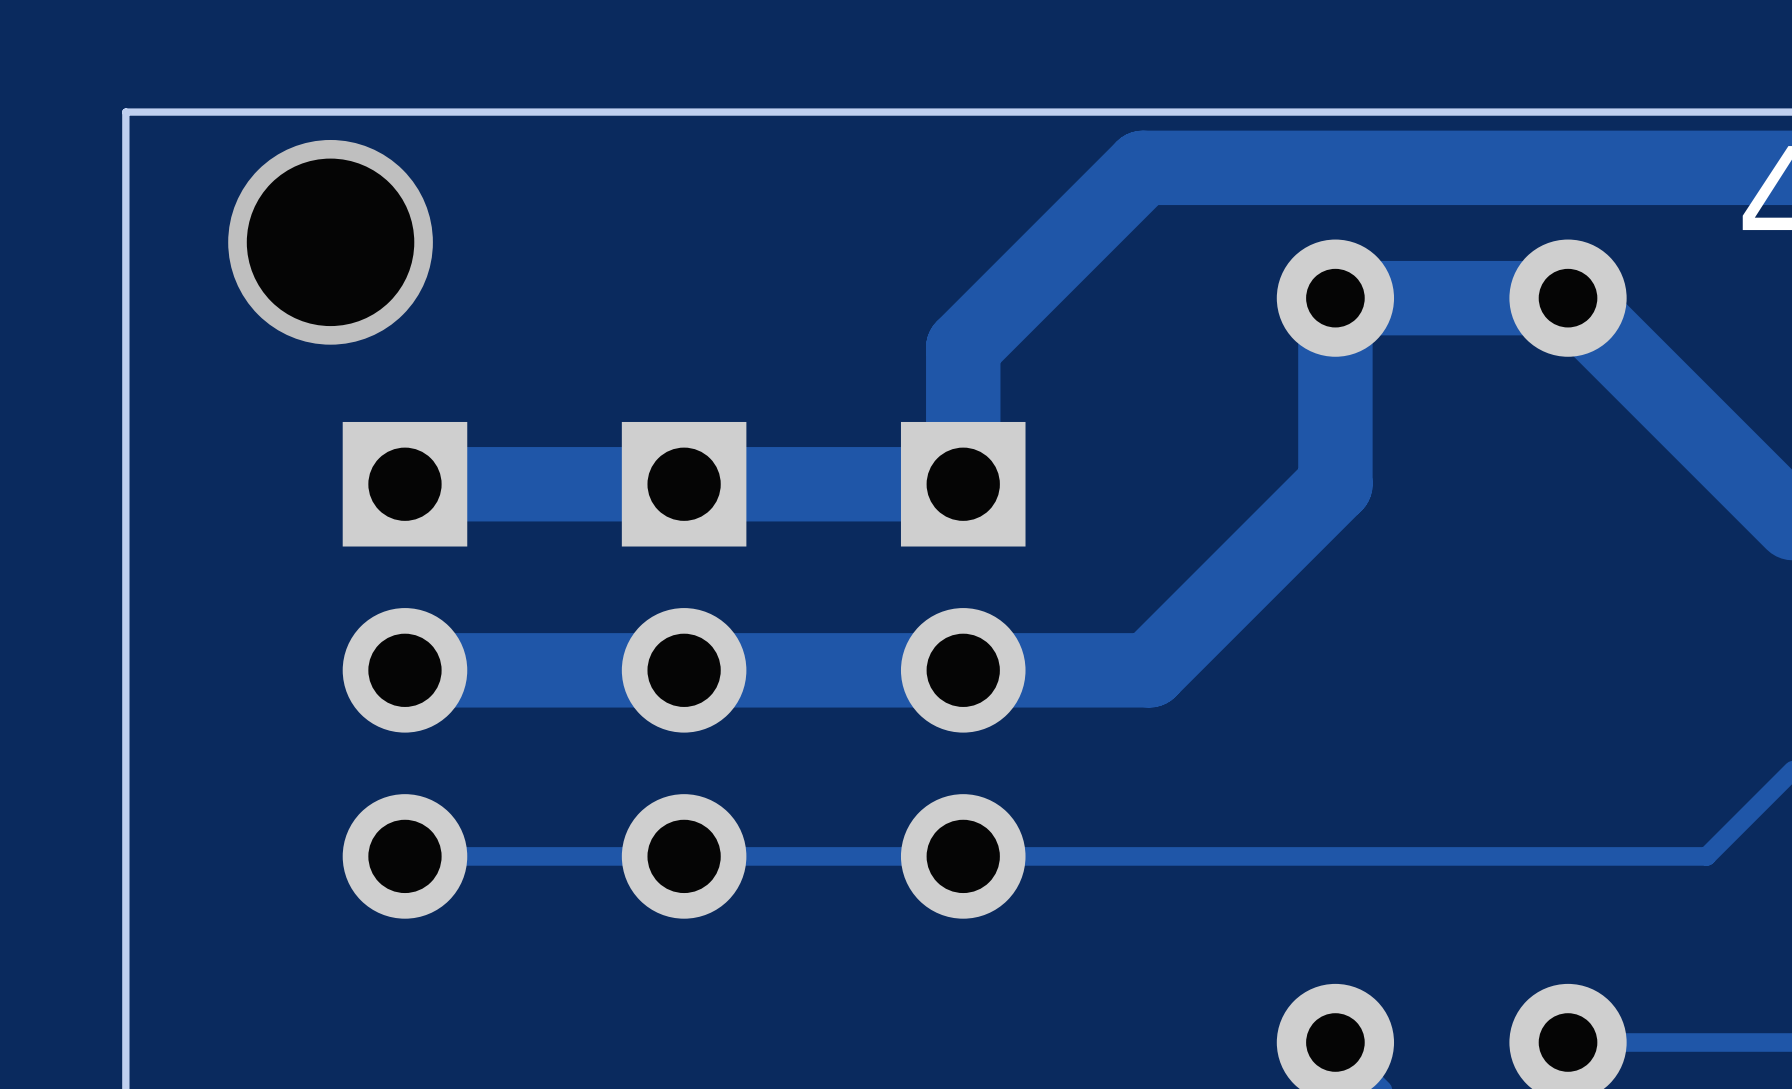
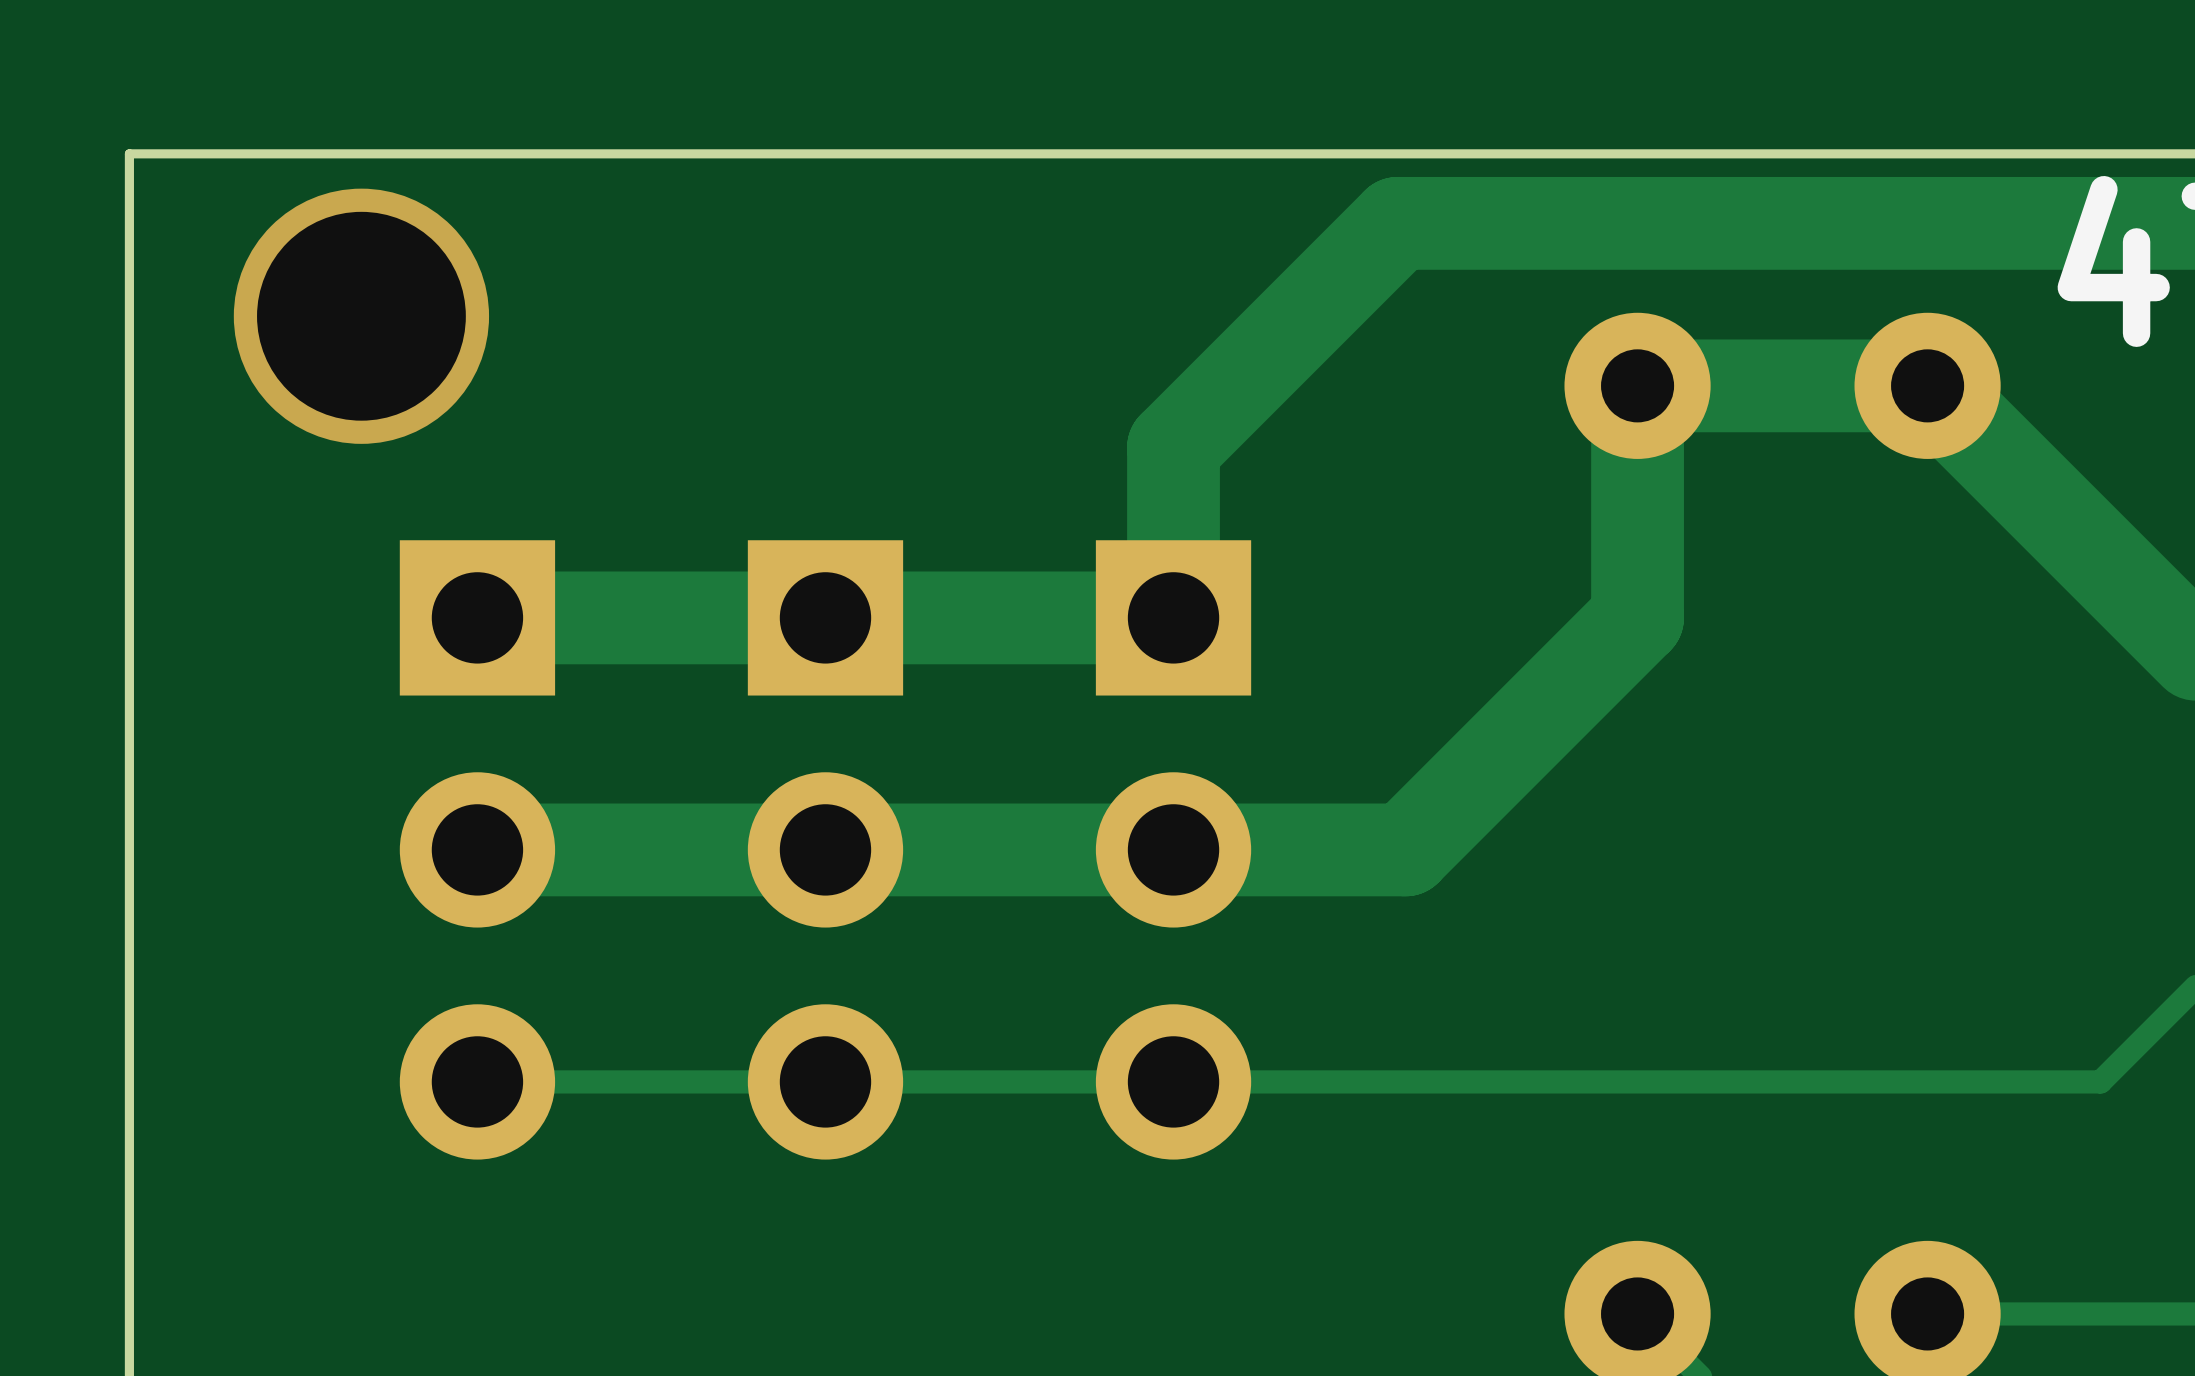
via position: (330, 242) -> (361, 316)

